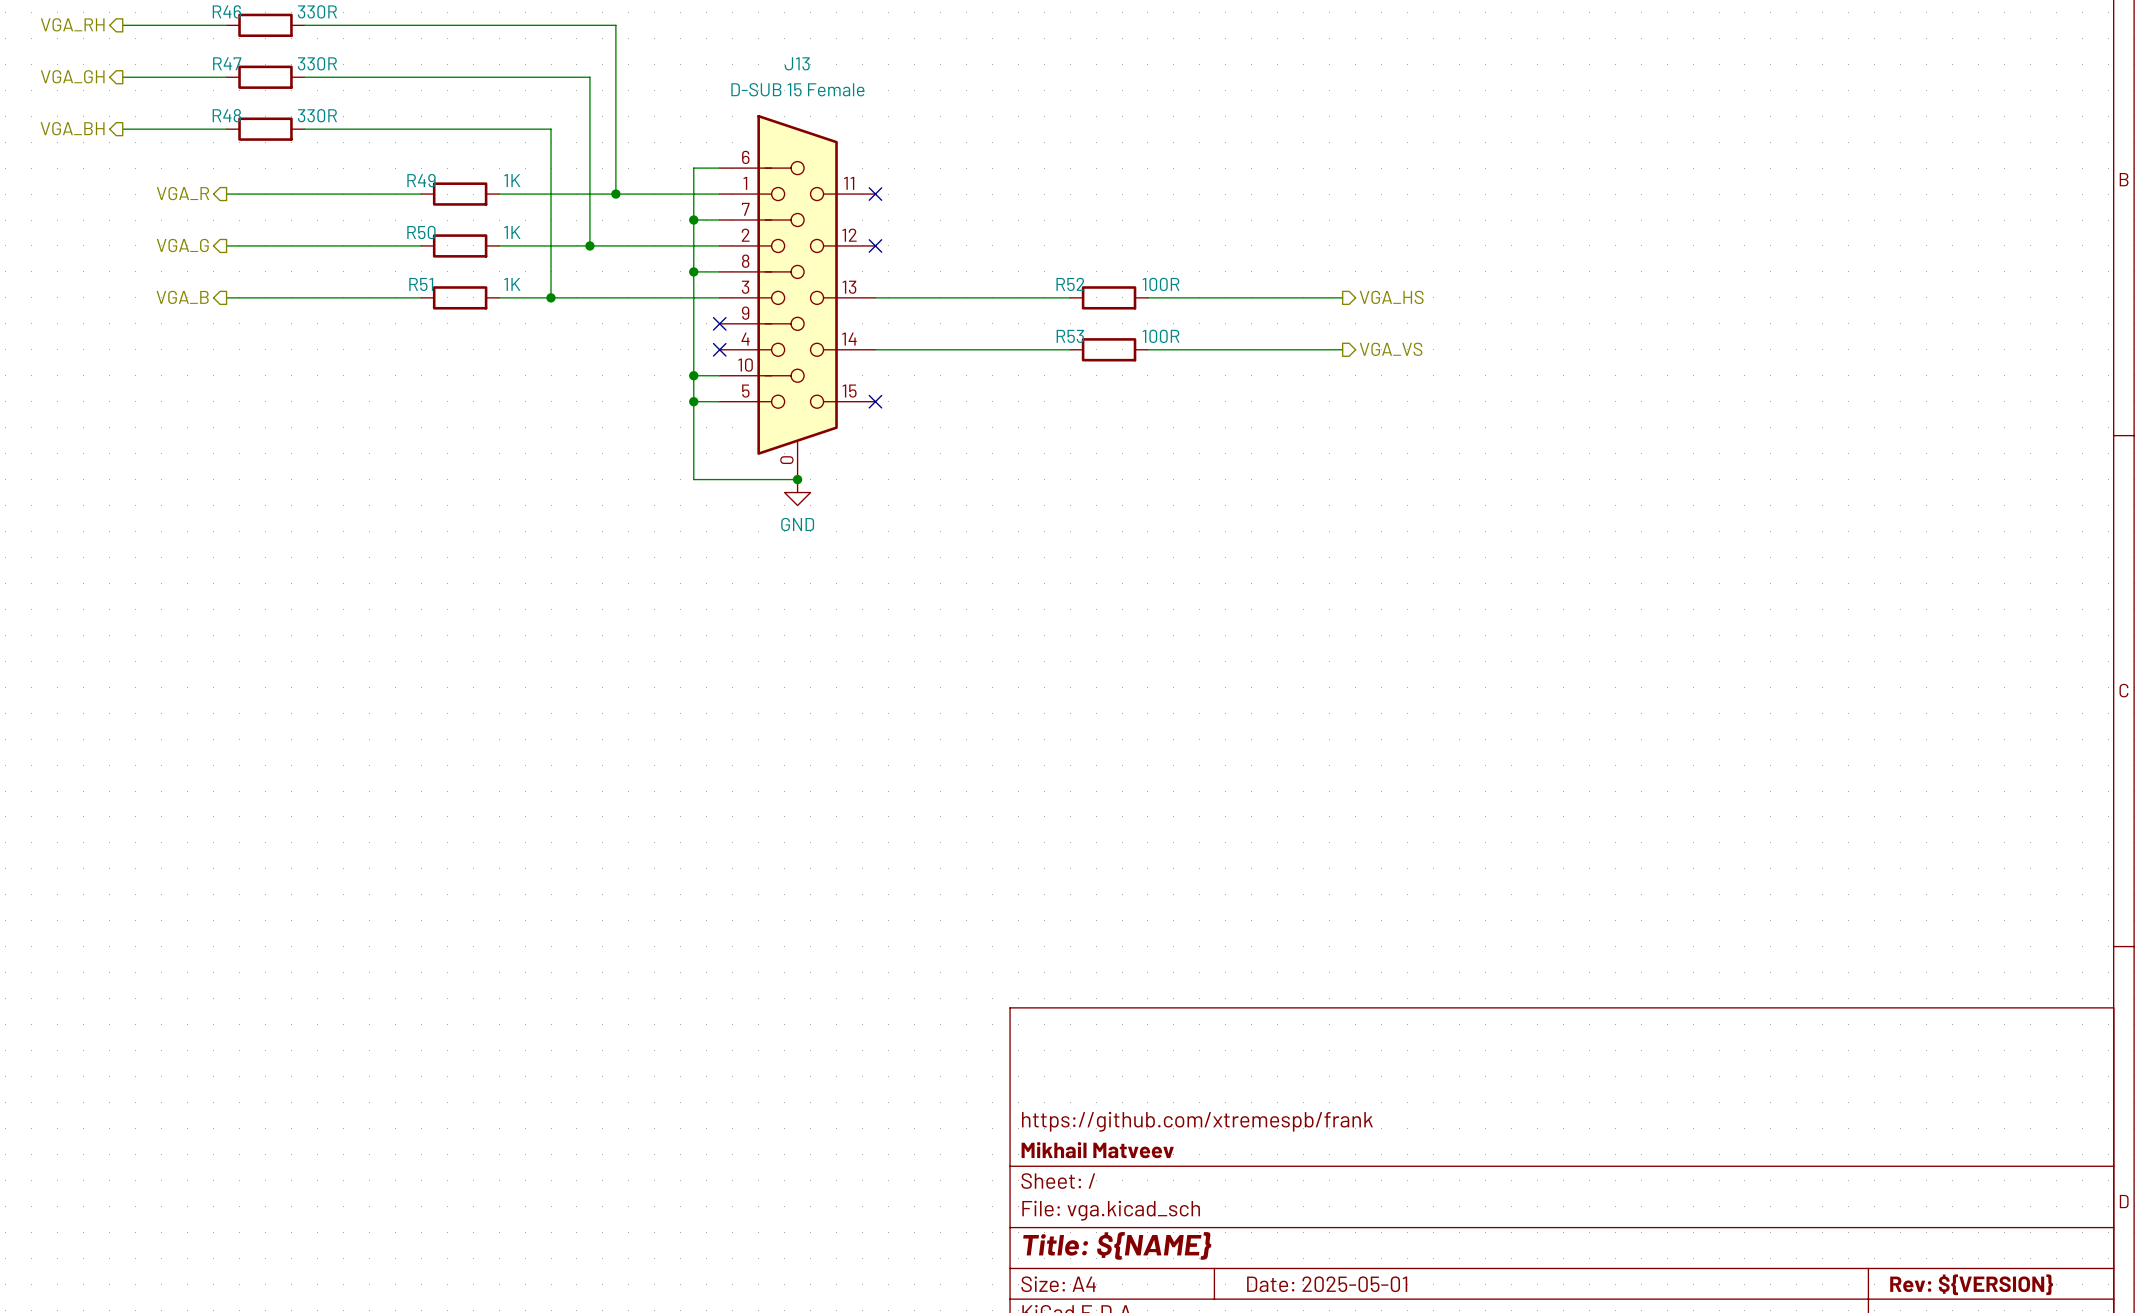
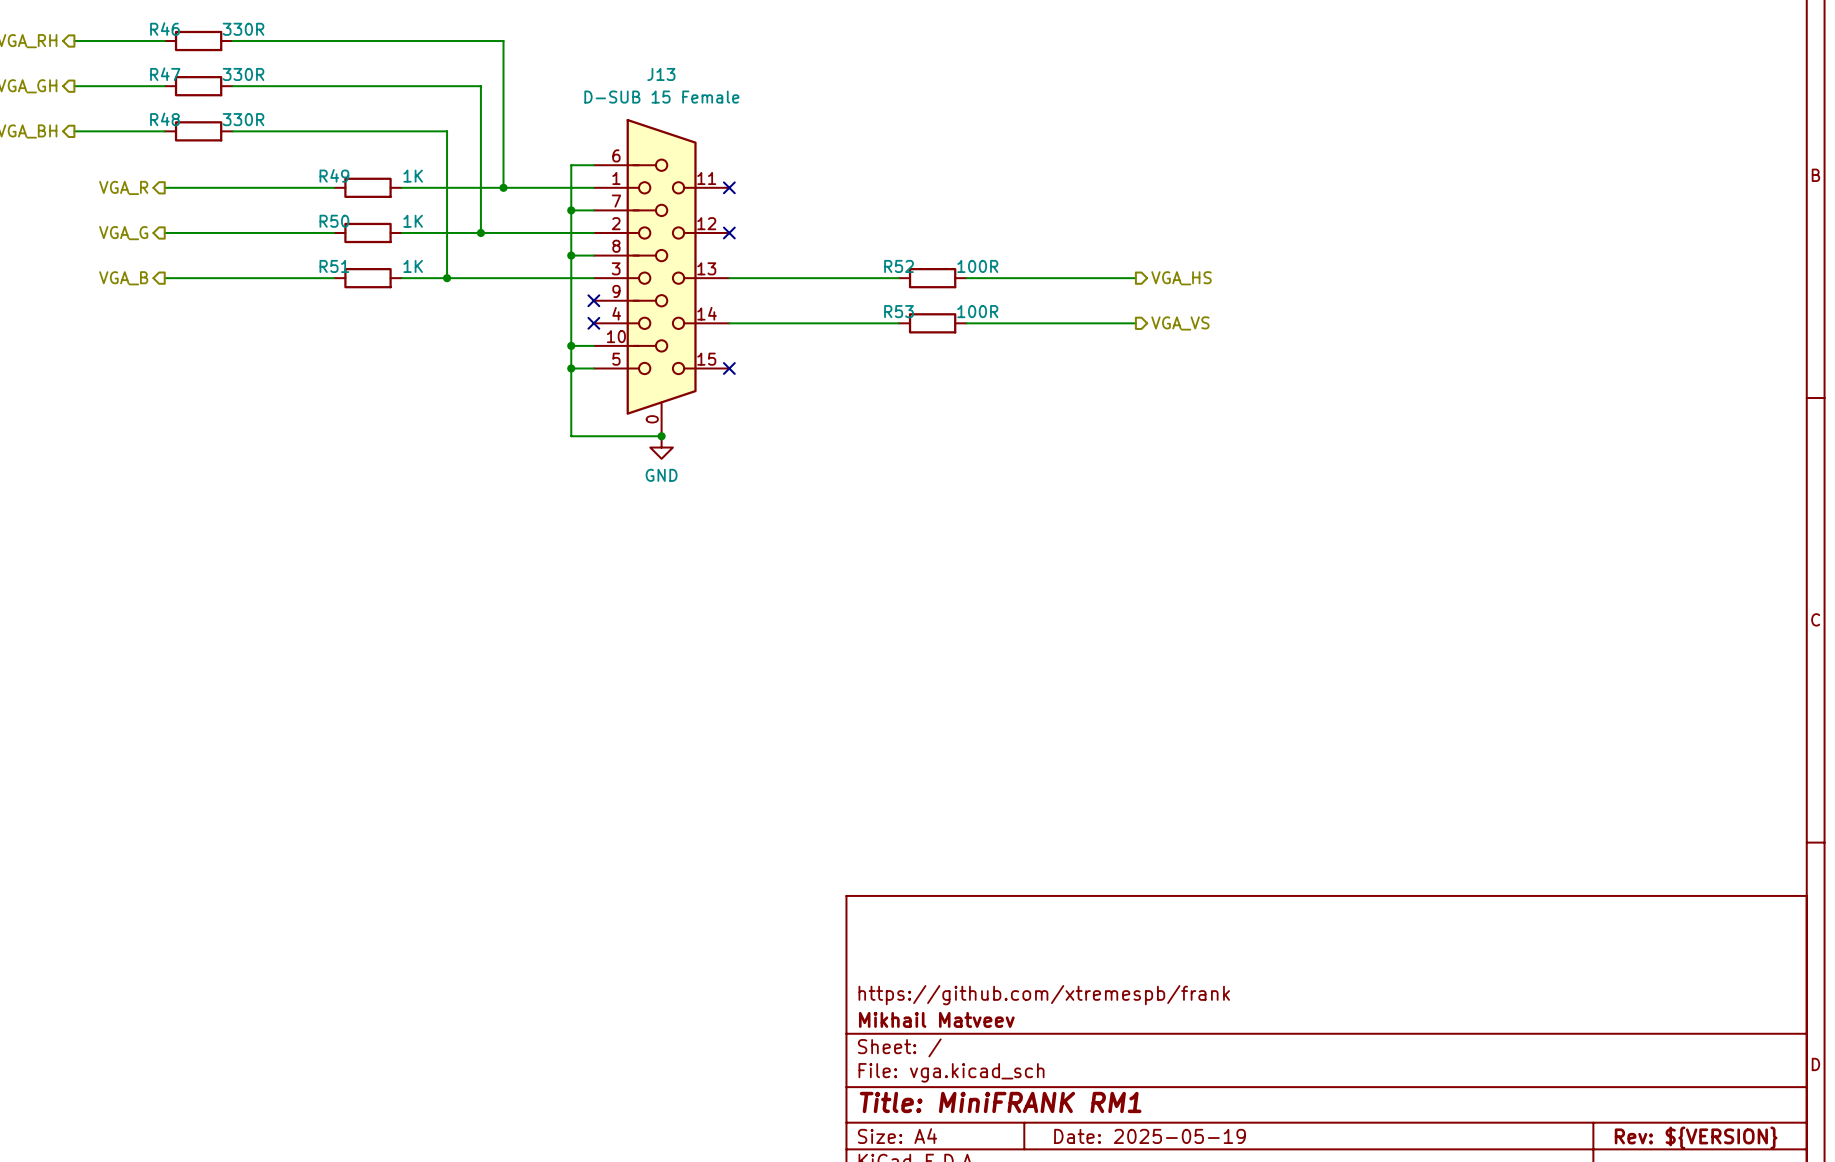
title block: Title: ${NAME} (1117, 1245) -> Title: MiniFRANK RM1 (1000, 1102)
title block: Date: 2025-05-01 (1327, 1284) -> Date: 2025-05-19 (1149, 1136)

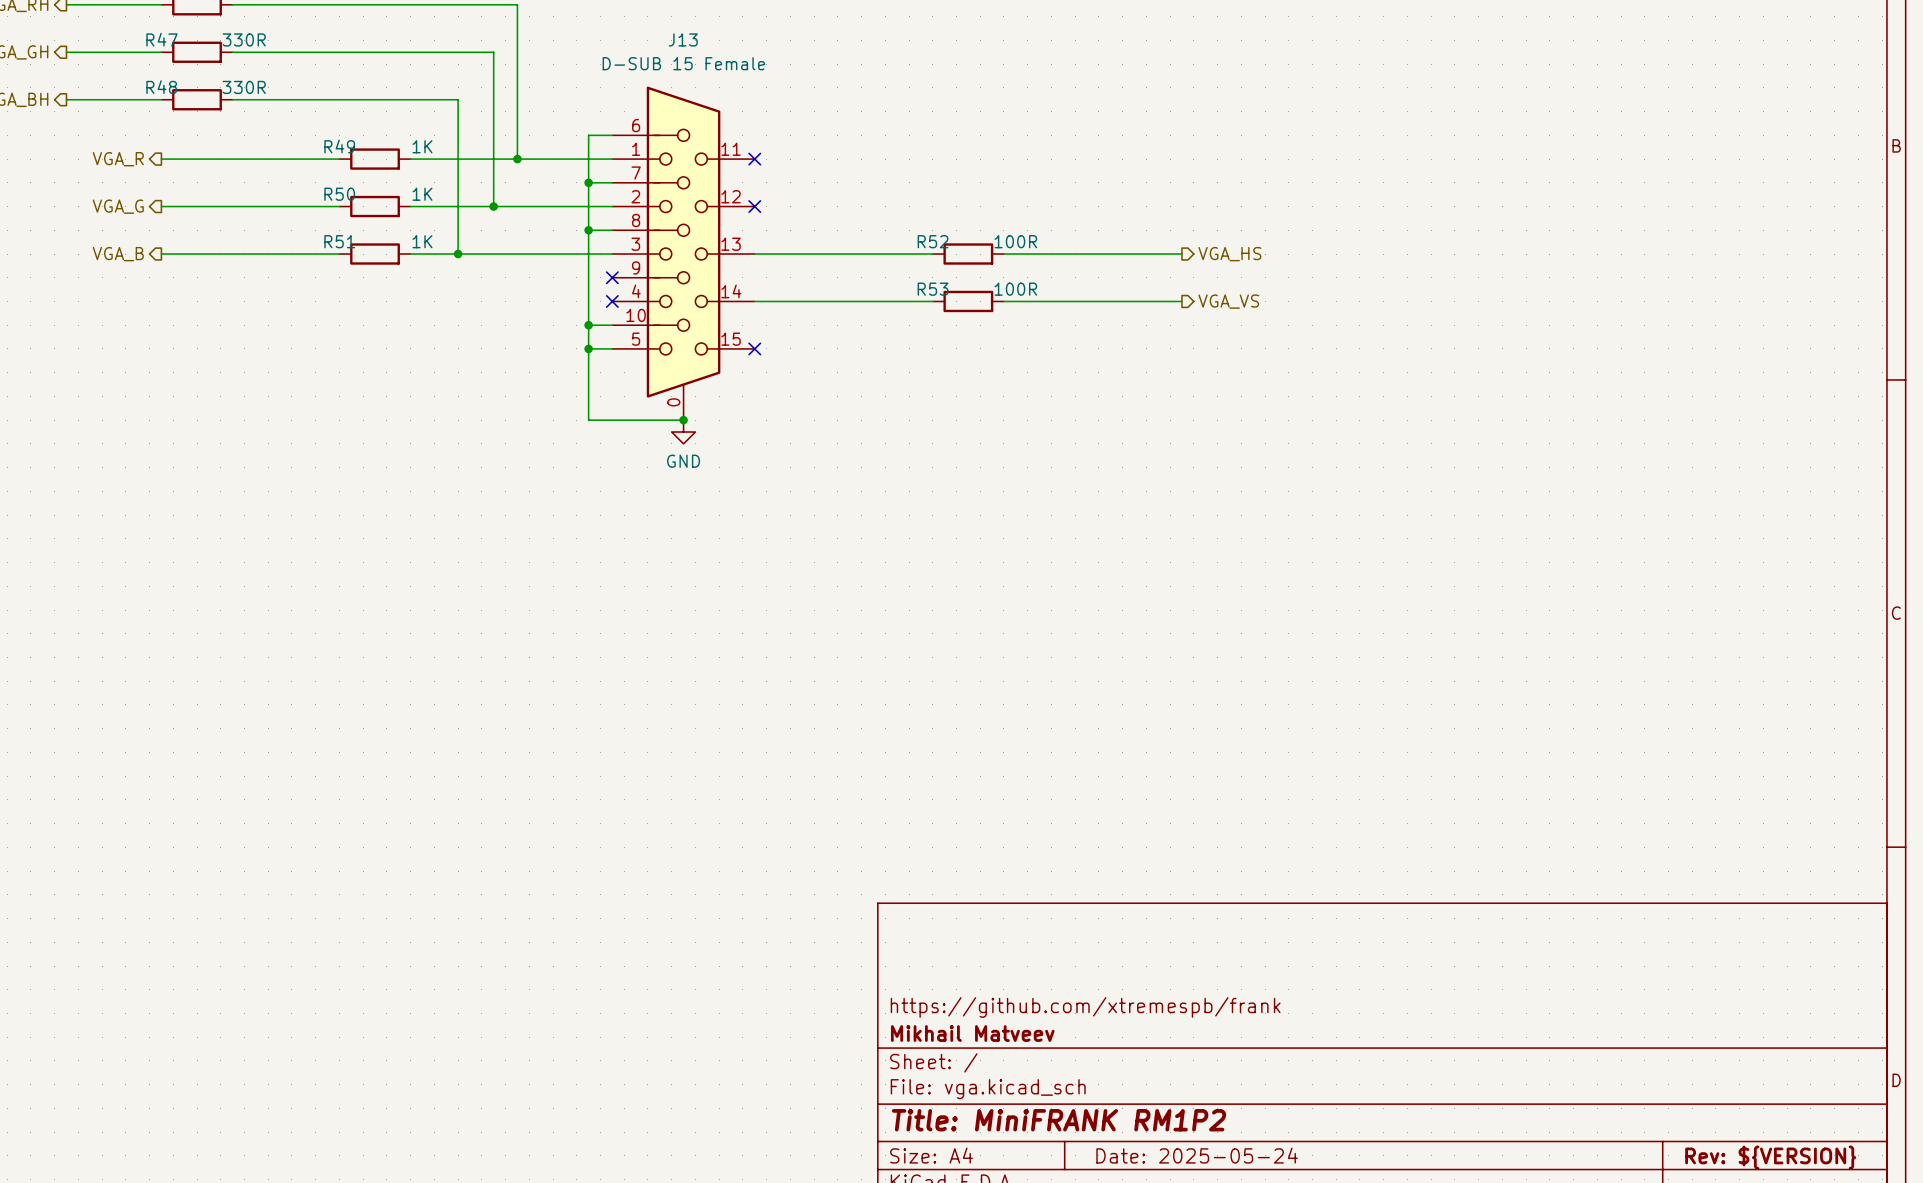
title block: Title: MiniFRANK RM1 (1000, 1102) -> Title: MiniFRANK RM1P2 (1059, 1120)
title block: Date: 2025-05-19 (1149, 1136) -> Date: 2025-05-24 (1197, 1155)

